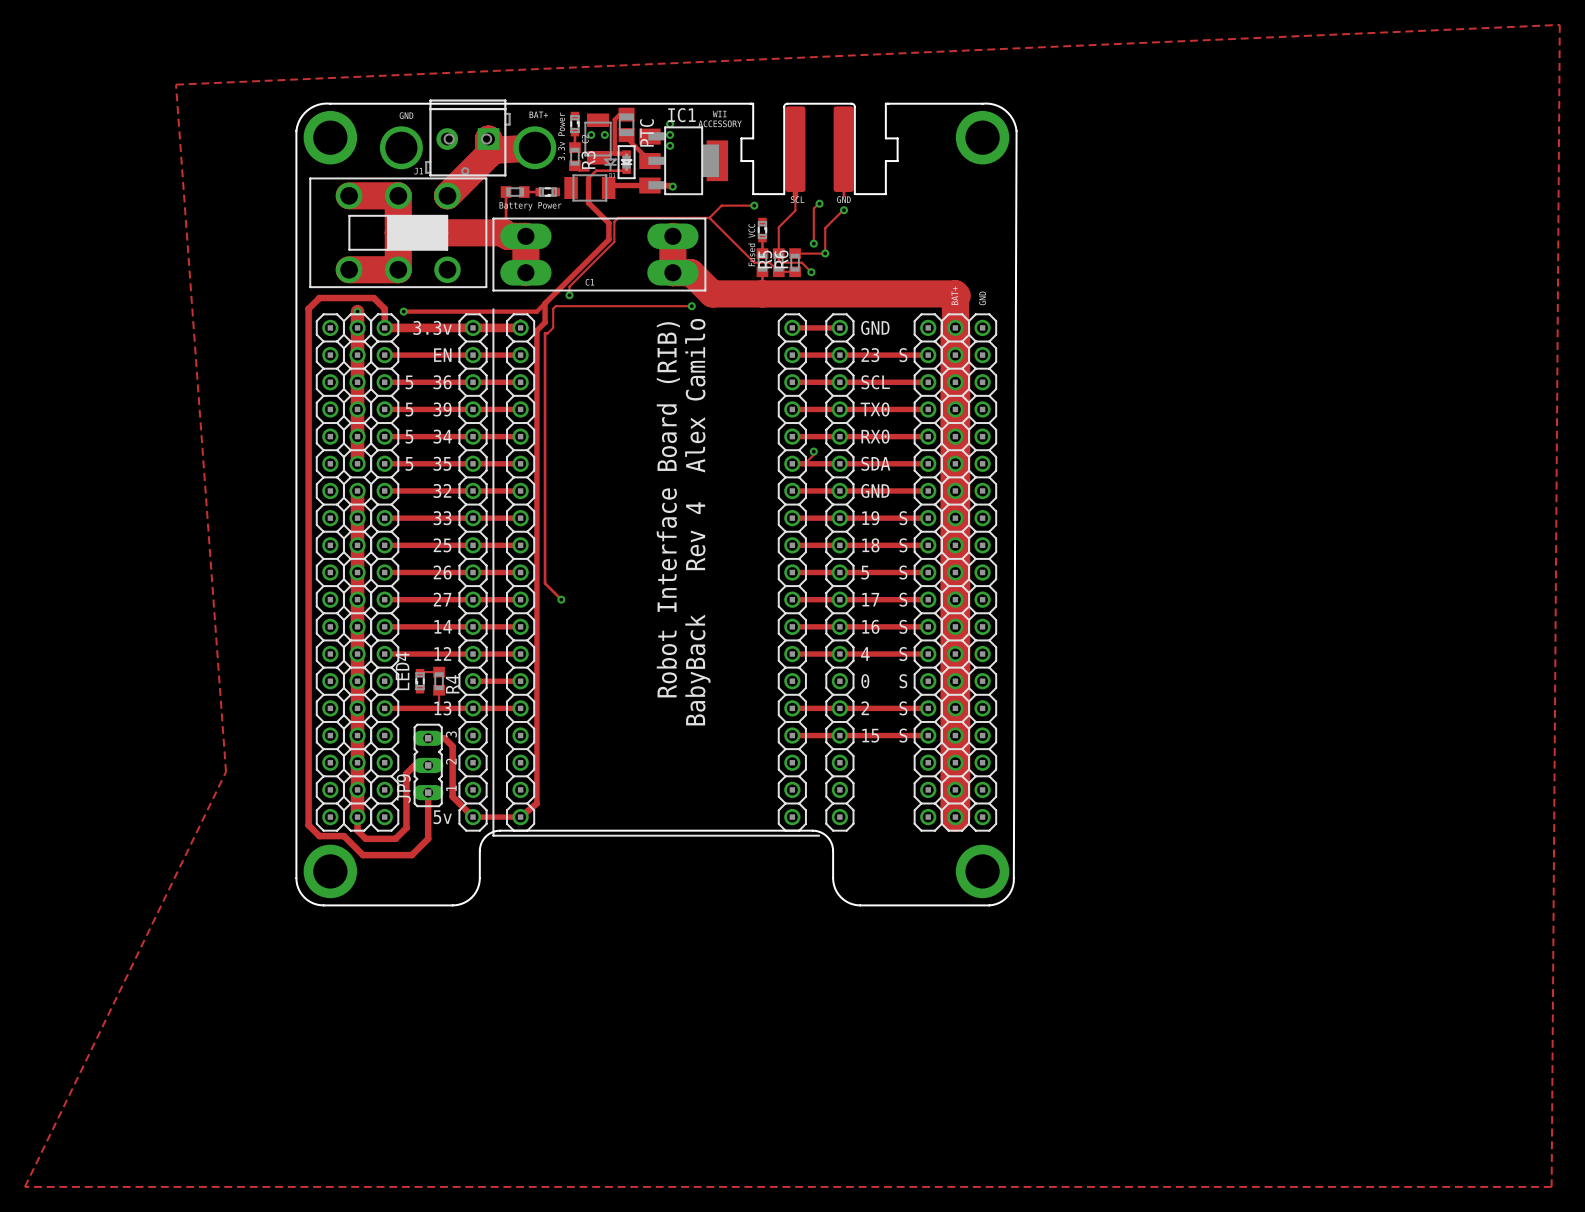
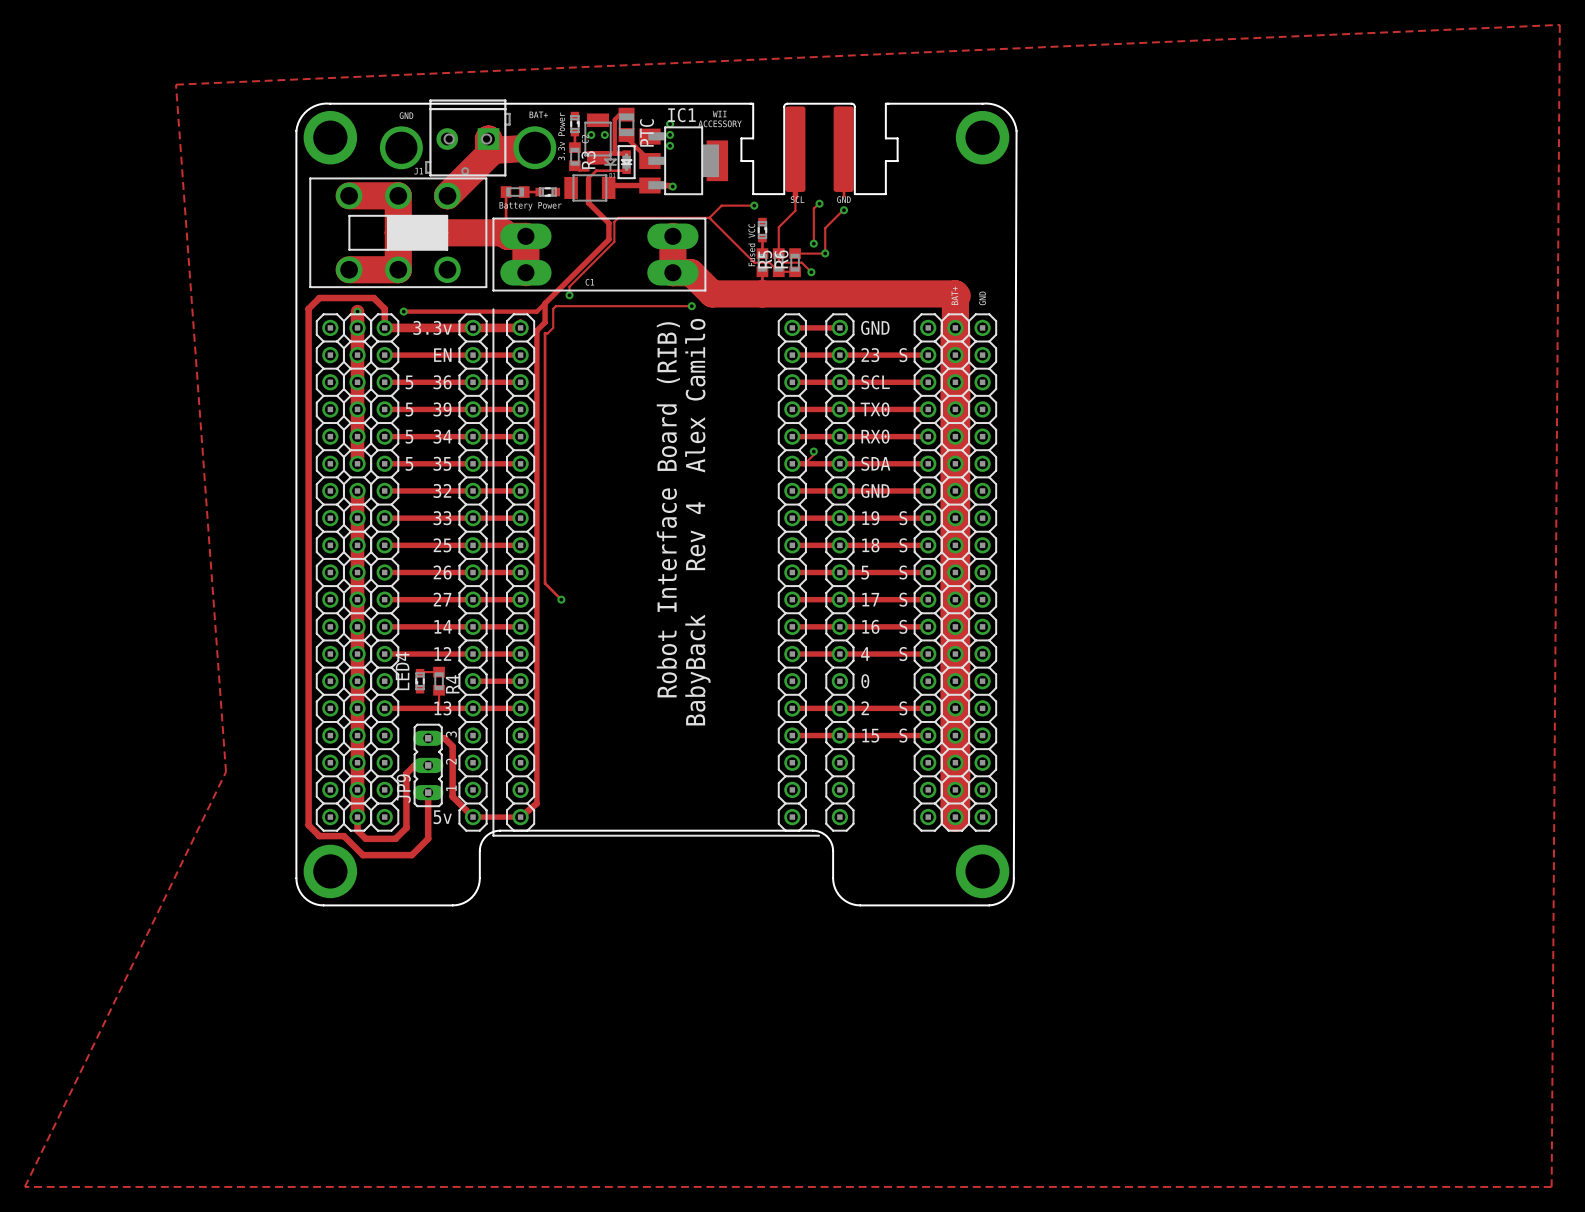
text: S (903, 681) -> none

